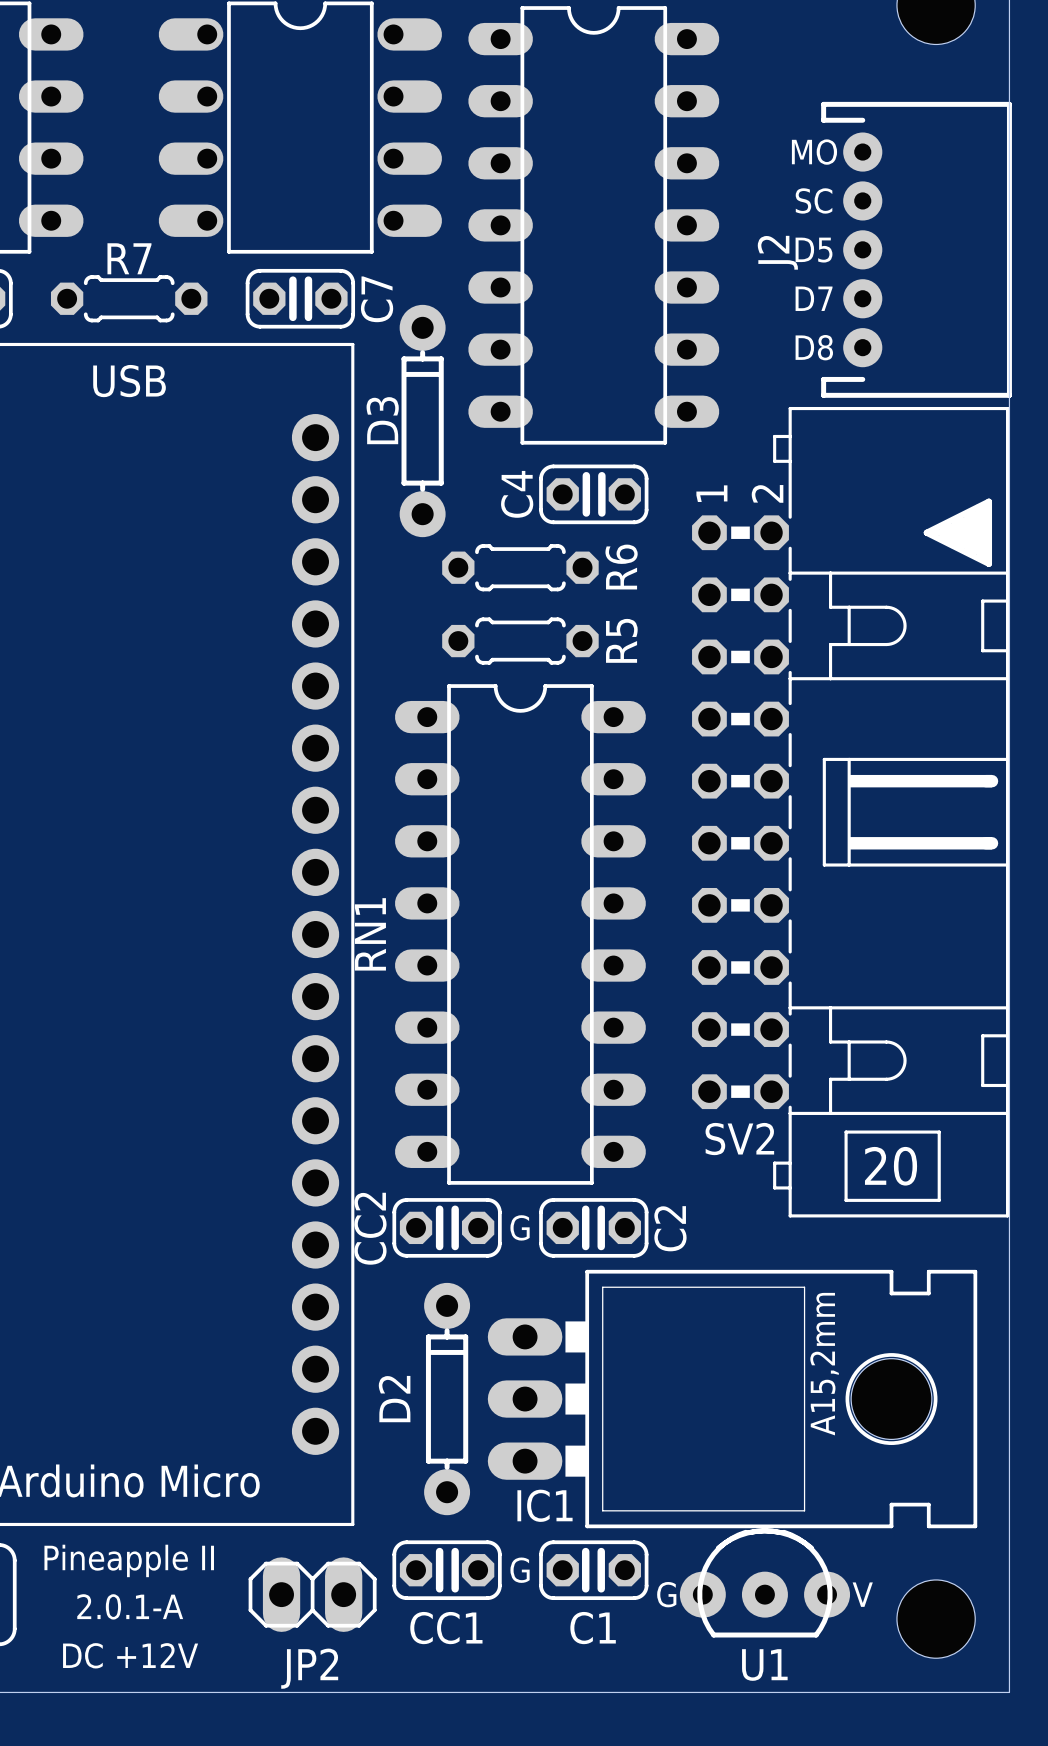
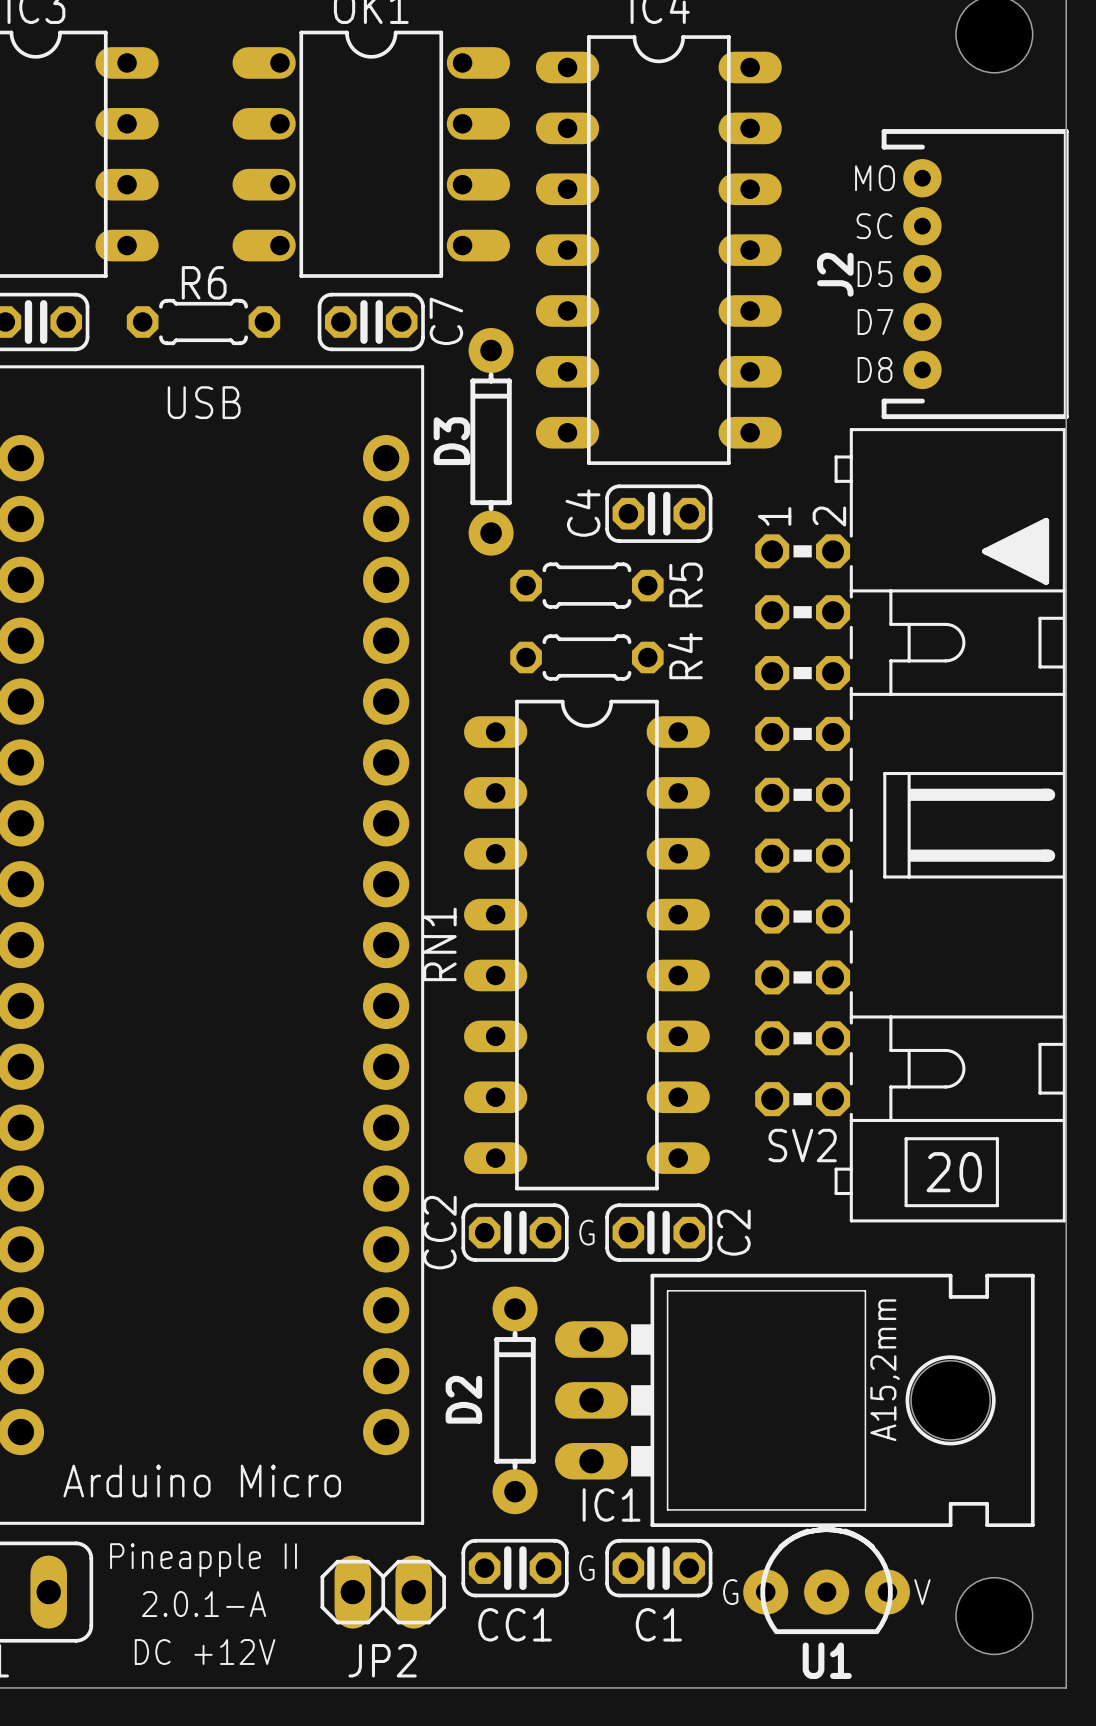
R7 name: R7 (129, 258) -> R6 (204, 282)
R6 name: R6 (621, 567) -> R5 (686, 584)
R5 name: R5 (621, 640) -> R4 (685, 656)

